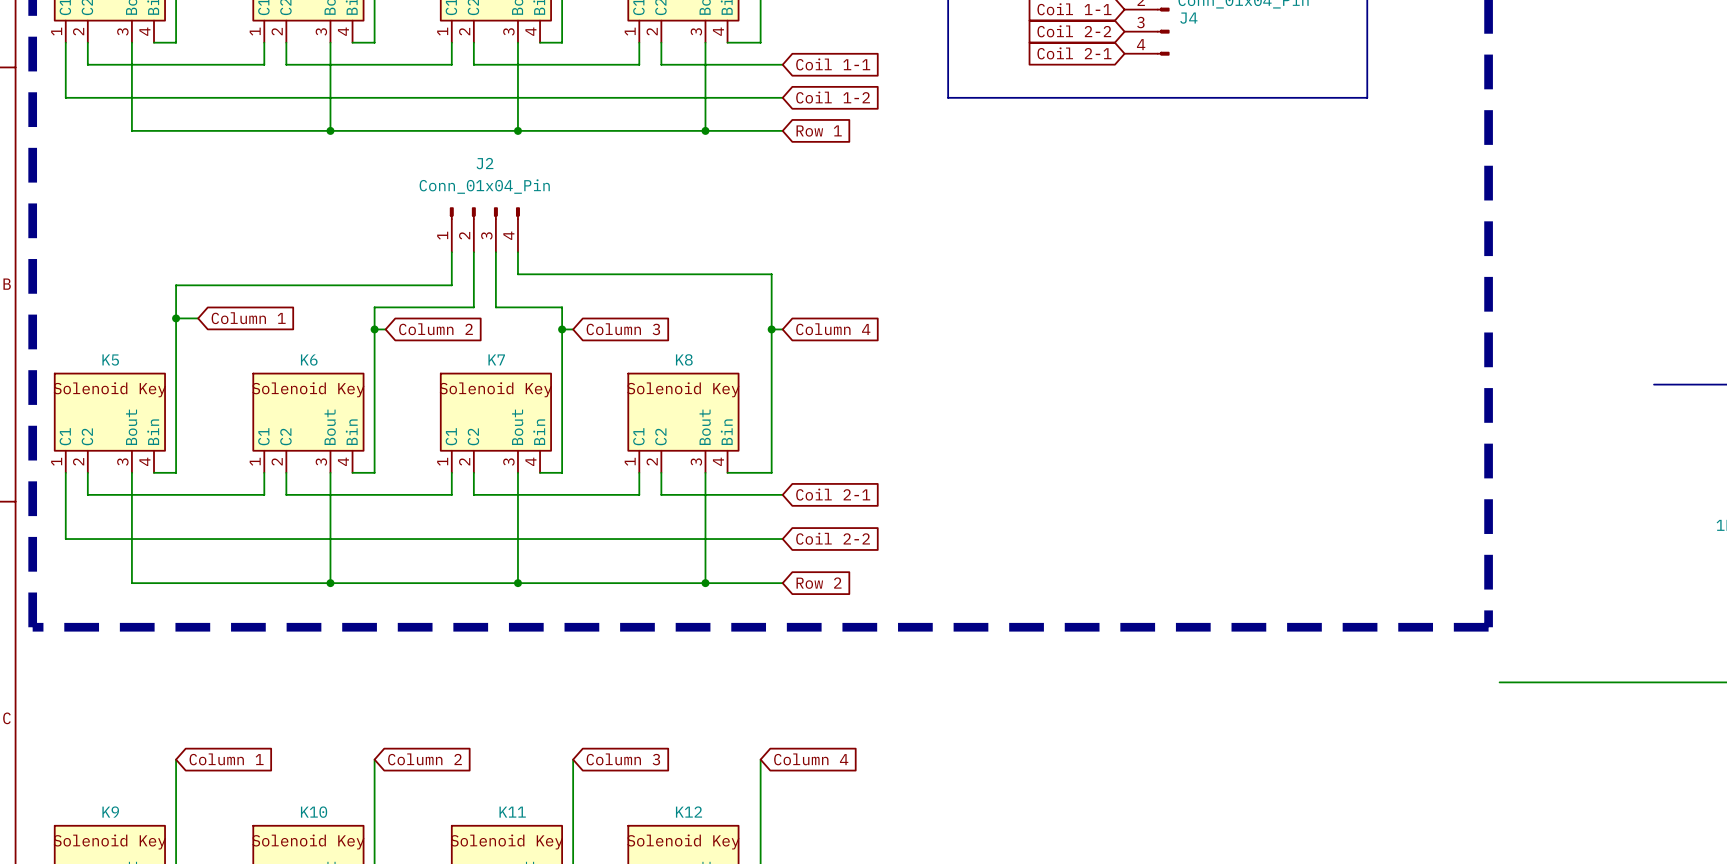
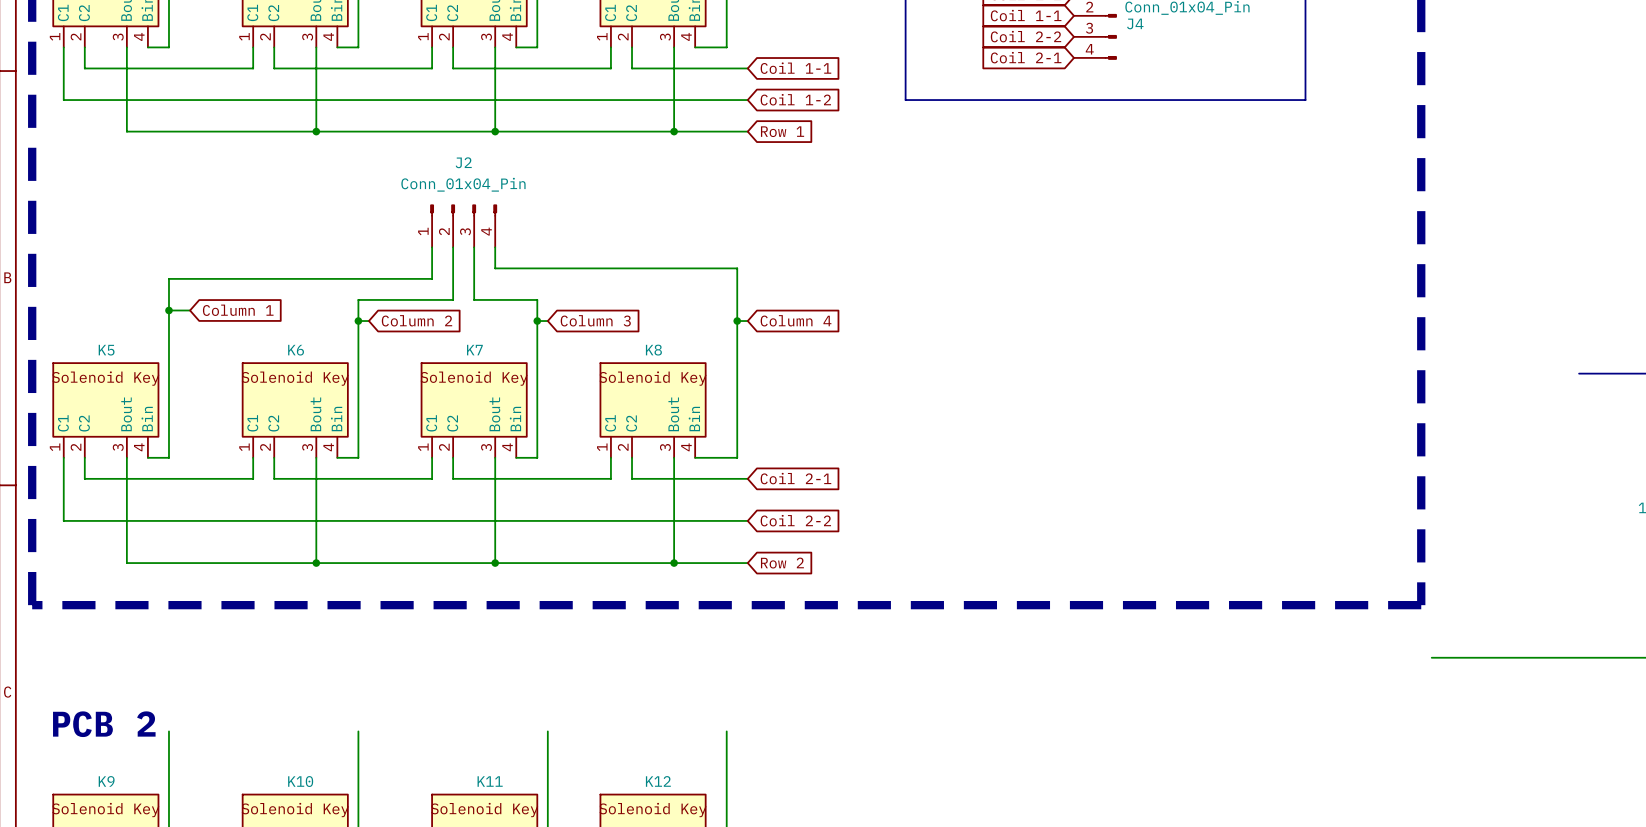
text: none -> PCB 2 (104, 724)
global label: Column 1 (226, 759) -> none
global label: Column 2 (424, 759) -> none
global label: Column 3 (623, 759) -> none
global label: Column 4 (811, 759) -> none

